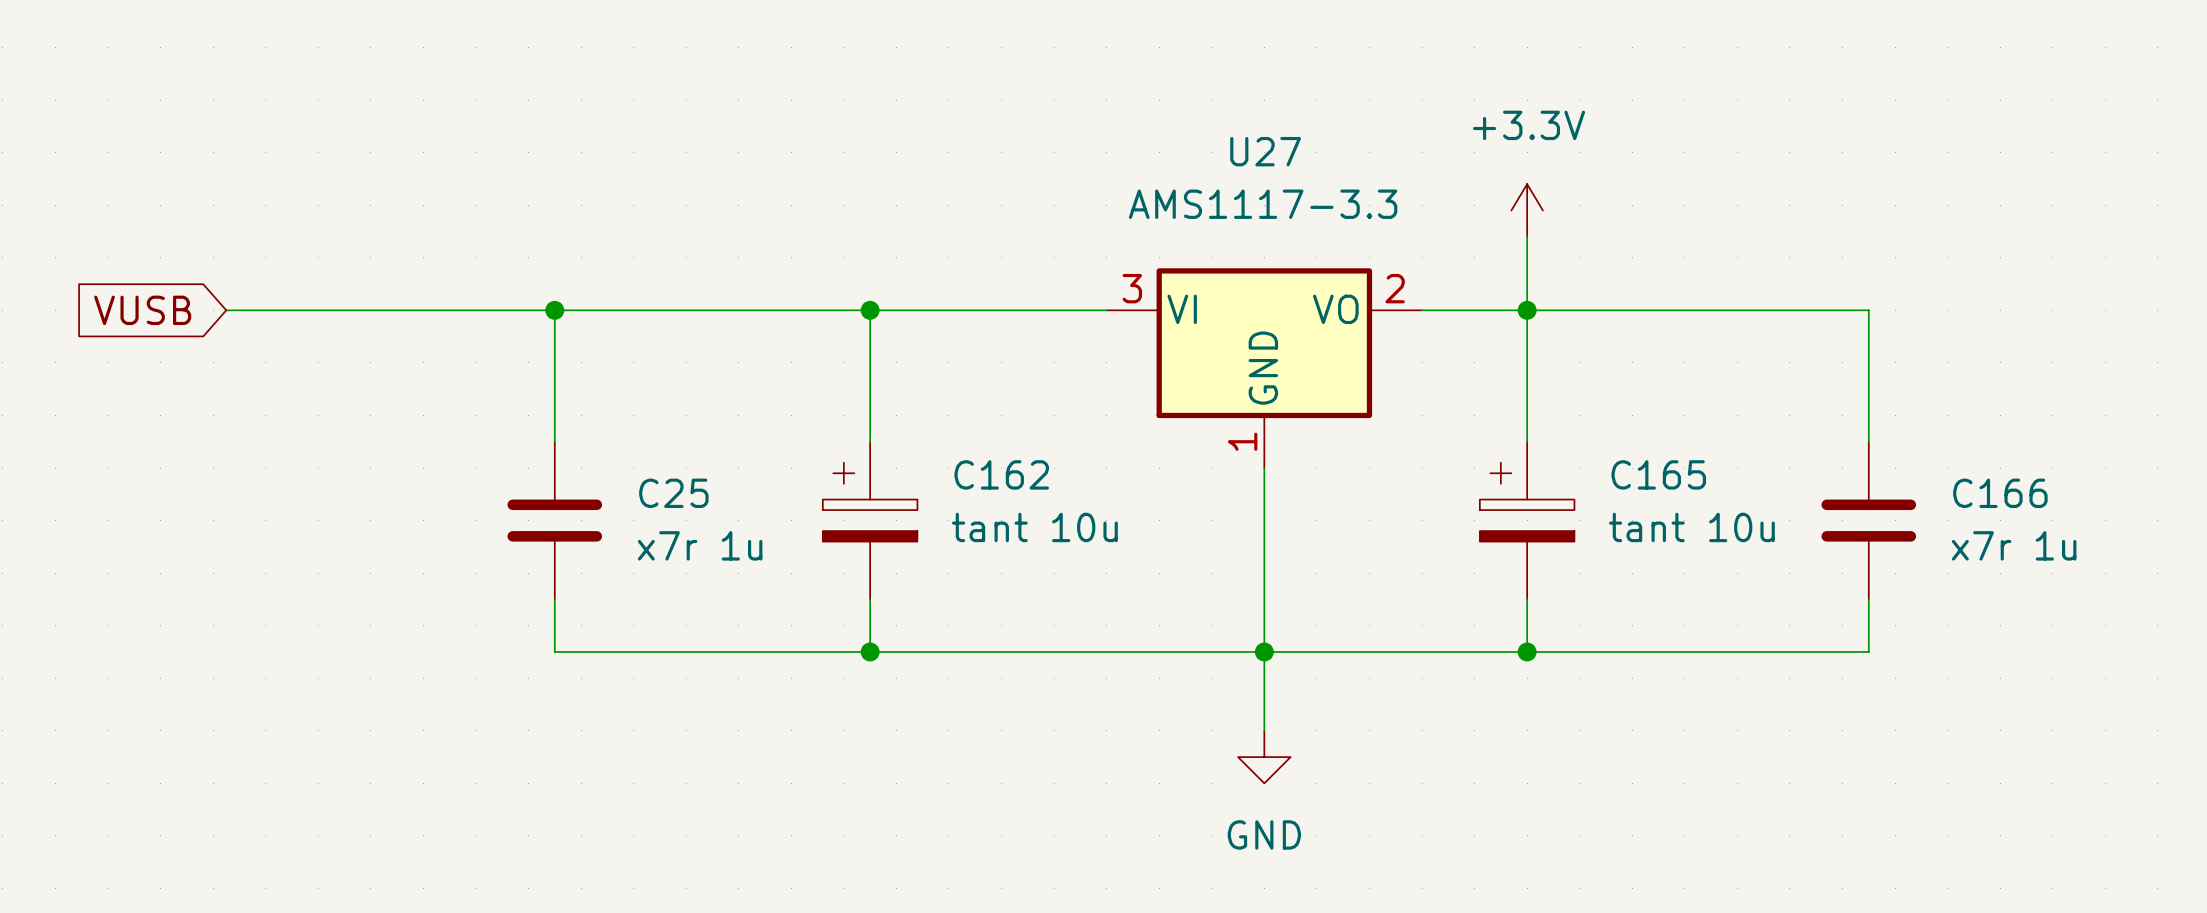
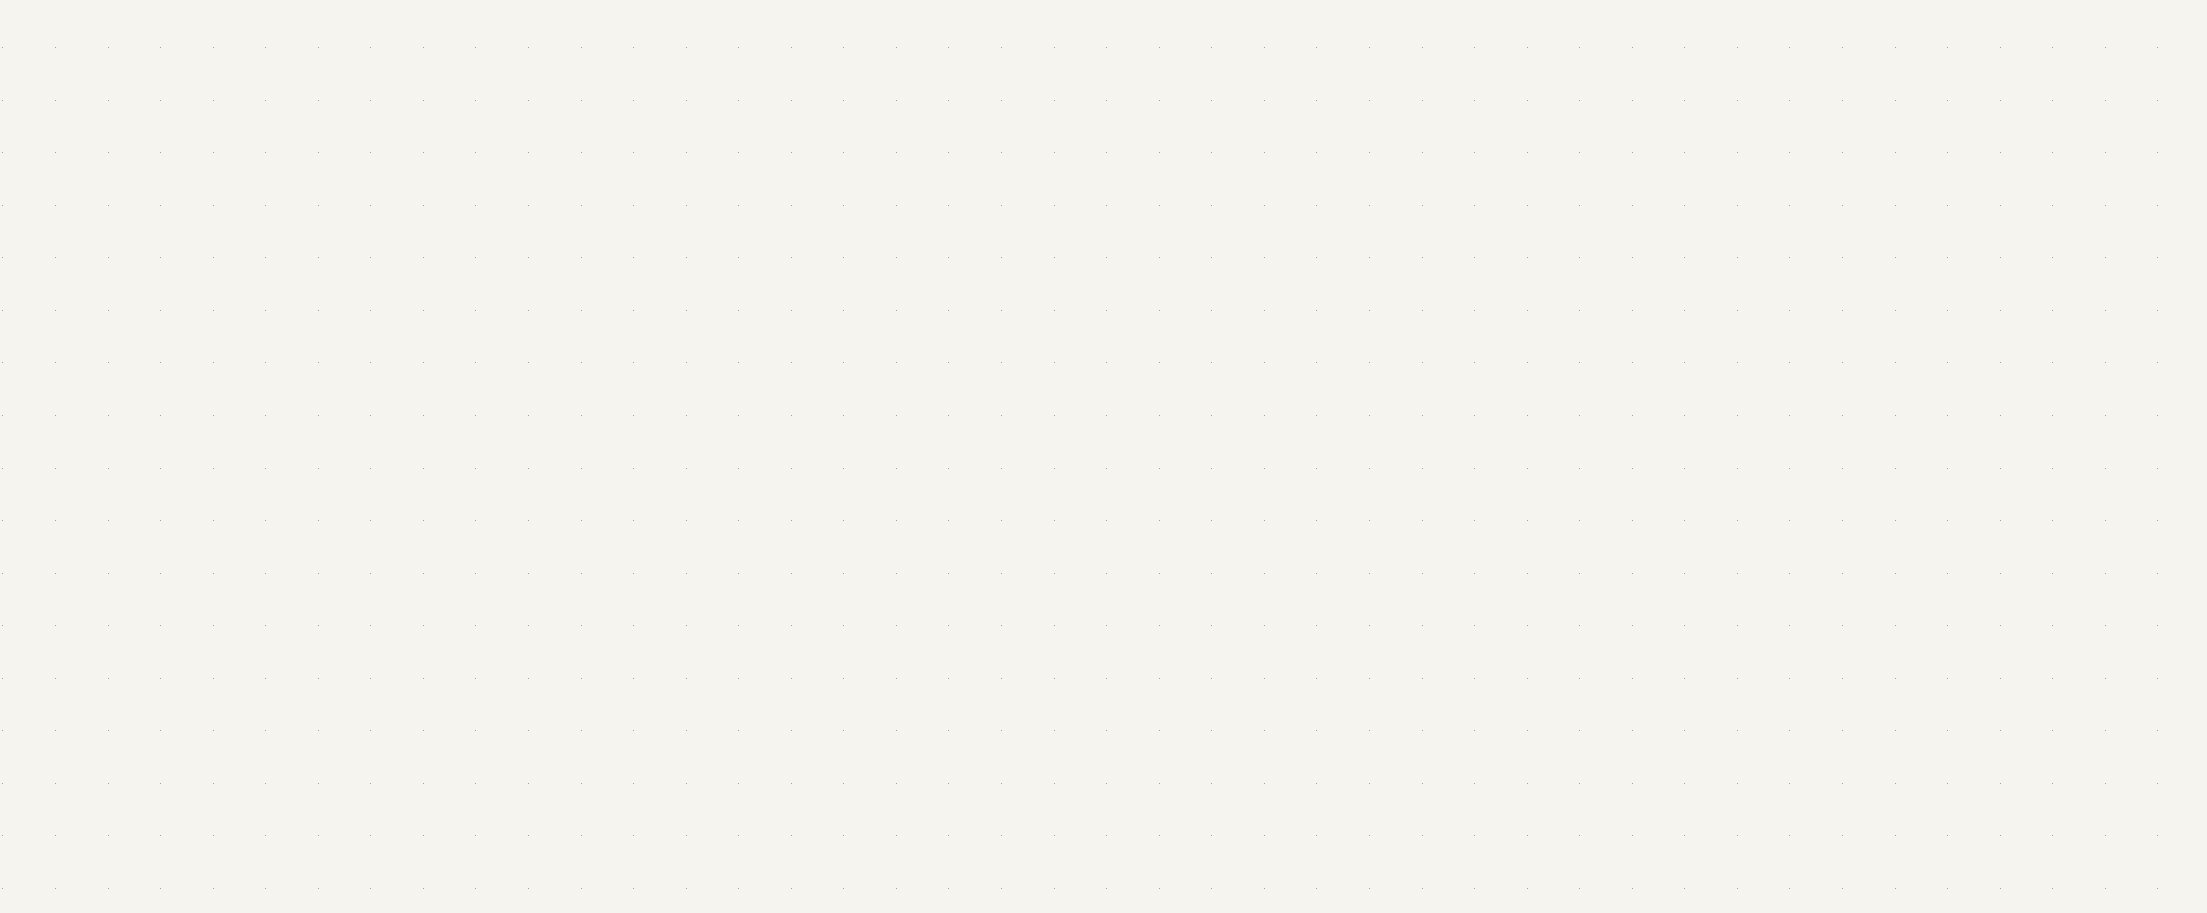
power symbol: +3.3V (1527, 210) -> none
wire: (1527, 236) (1527, 441) -> none
global label: VUSB (142, 310) -> none
wire: (226, 310) (1106, 310) -> none
wire: (554, 310) (554, 441) -> none
junction: (554, 310) -> none
wire: (870, 310) (870, 441) -> none
junction: (870, 310) -> none
wire: (1422, 310) (1868, 310) (1868, 441) -> none
junction: (1527, 310) -> none
U27: AMS1117-3.3 (1264, 368) -> none
wire: (1264, 468) (1264, 730) -> none
C25: x7r 1u (554, 520) -> none
C162: tant 10u (870, 520) -> none
C165: tant 10u (1527, 520) -> none
C166: x7r 1u (1868, 520) -> none
wire: (554, 599) (554, 651) (1868, 651) (1868, 599) -> none
wire: (870, 599) (870, 651) -> none
wire: (1527, 599) (1527, 651) -> none
junction: (870, 651) -> none
junction: (1264, 651) -> none
junction: (1527, 651) -> none
power symbol: GND (1264, 757) -> none

